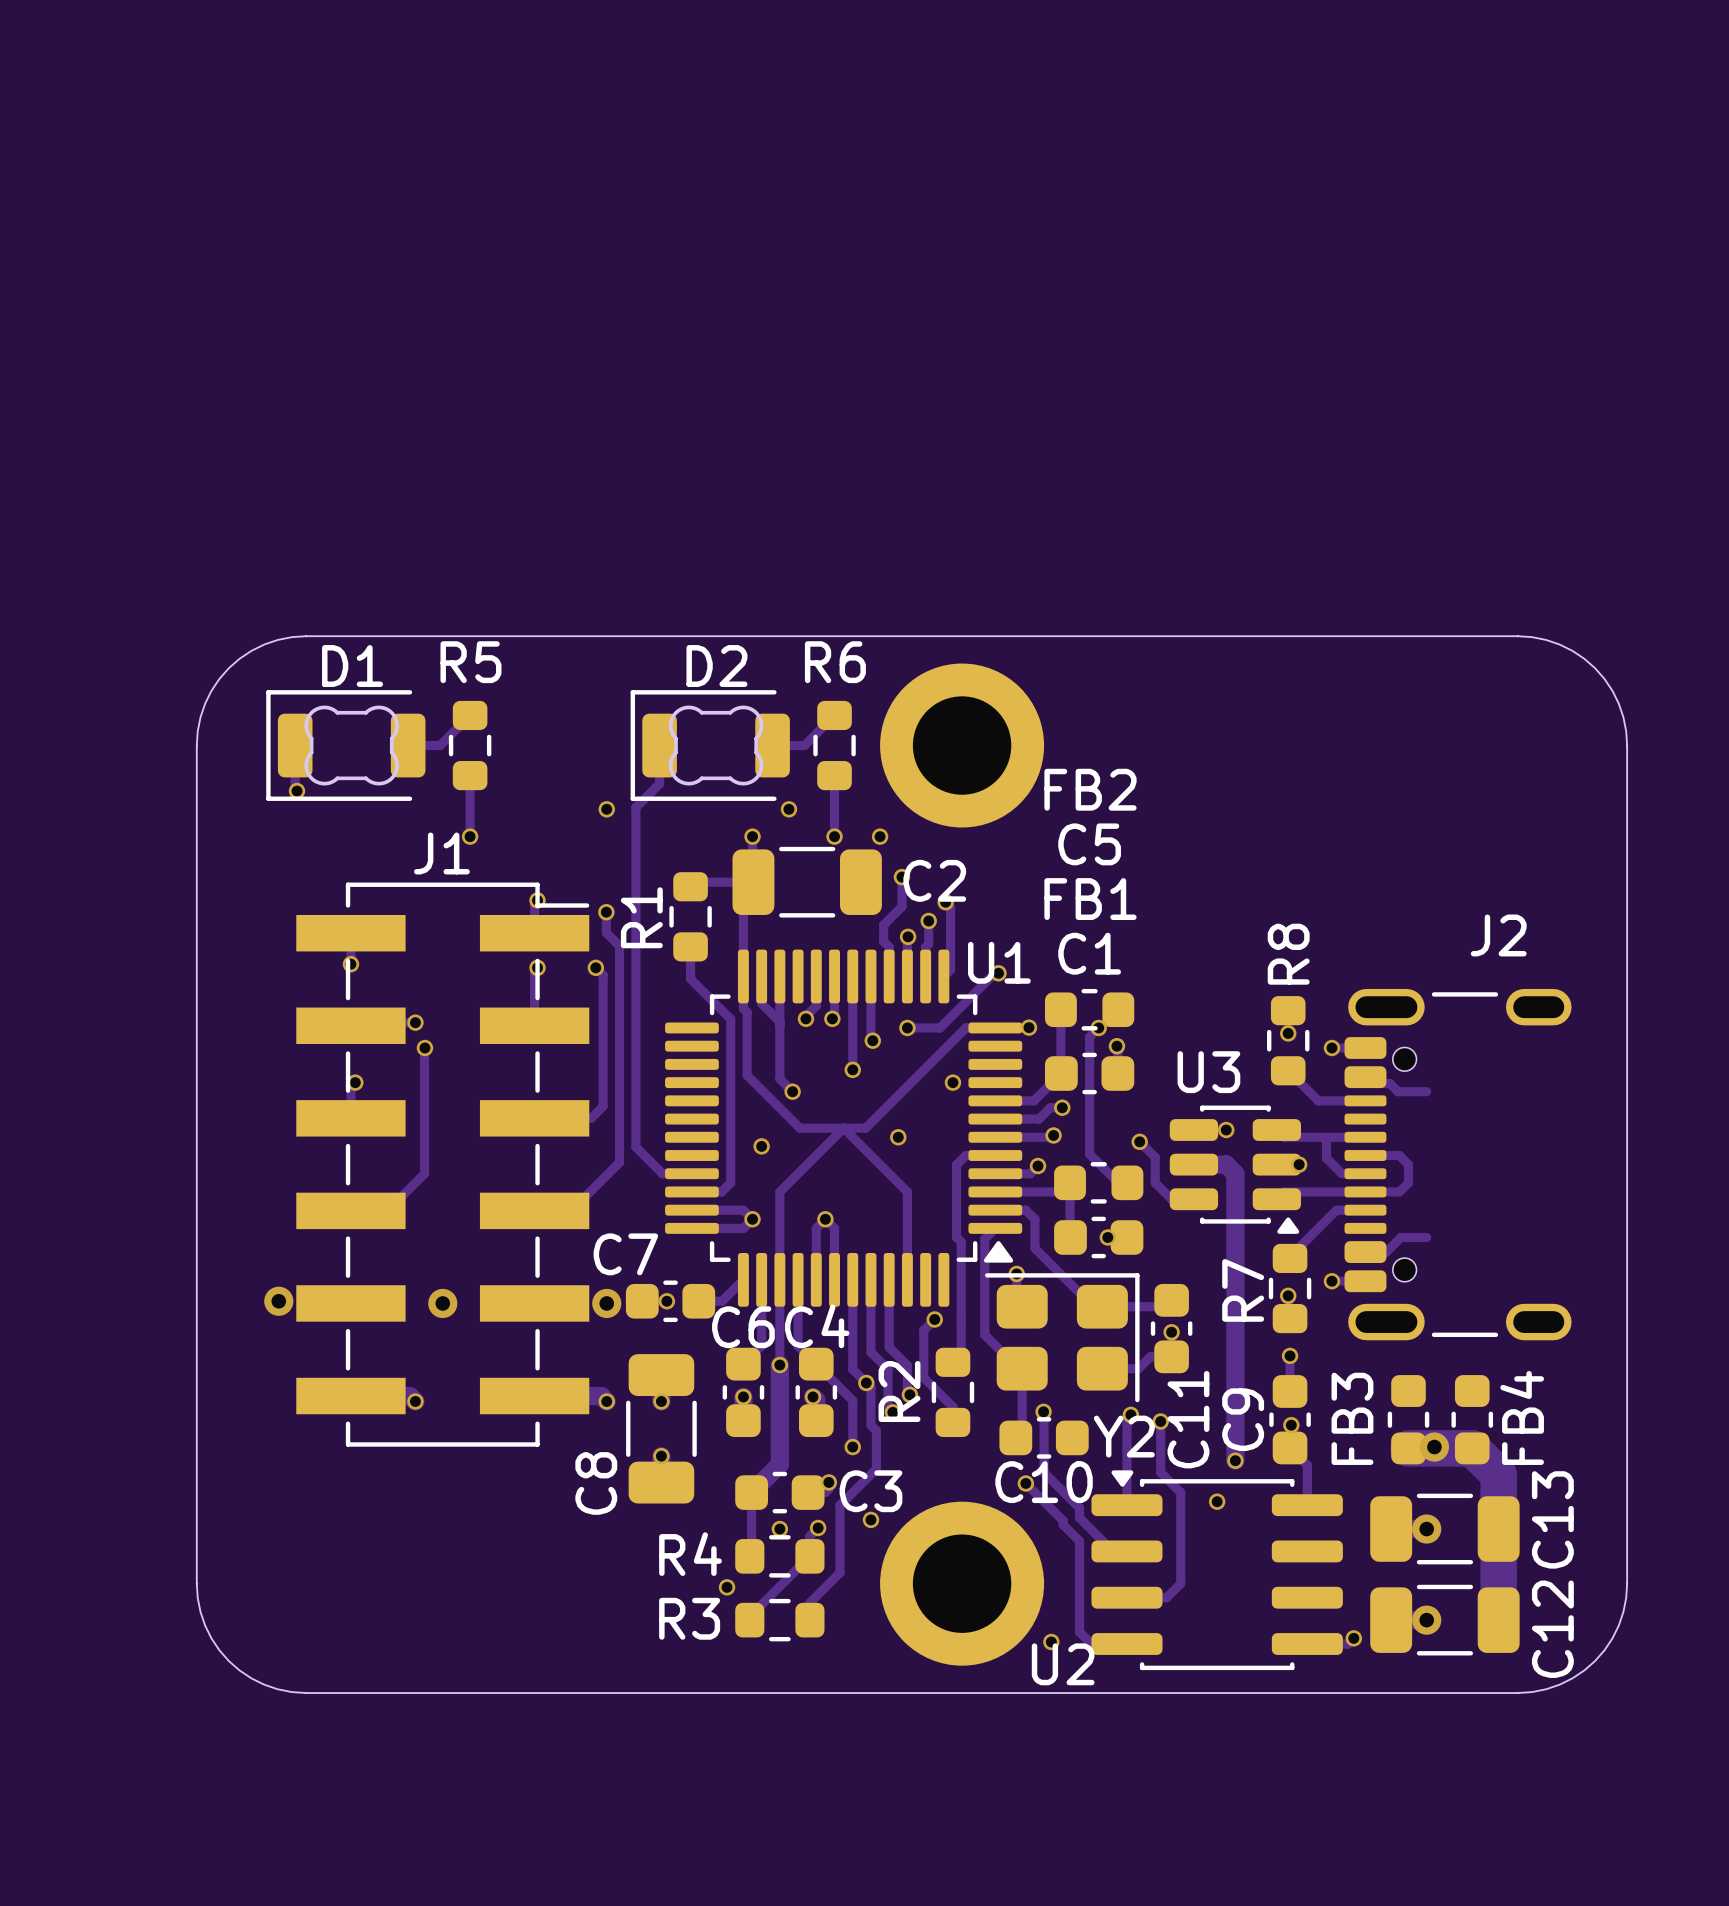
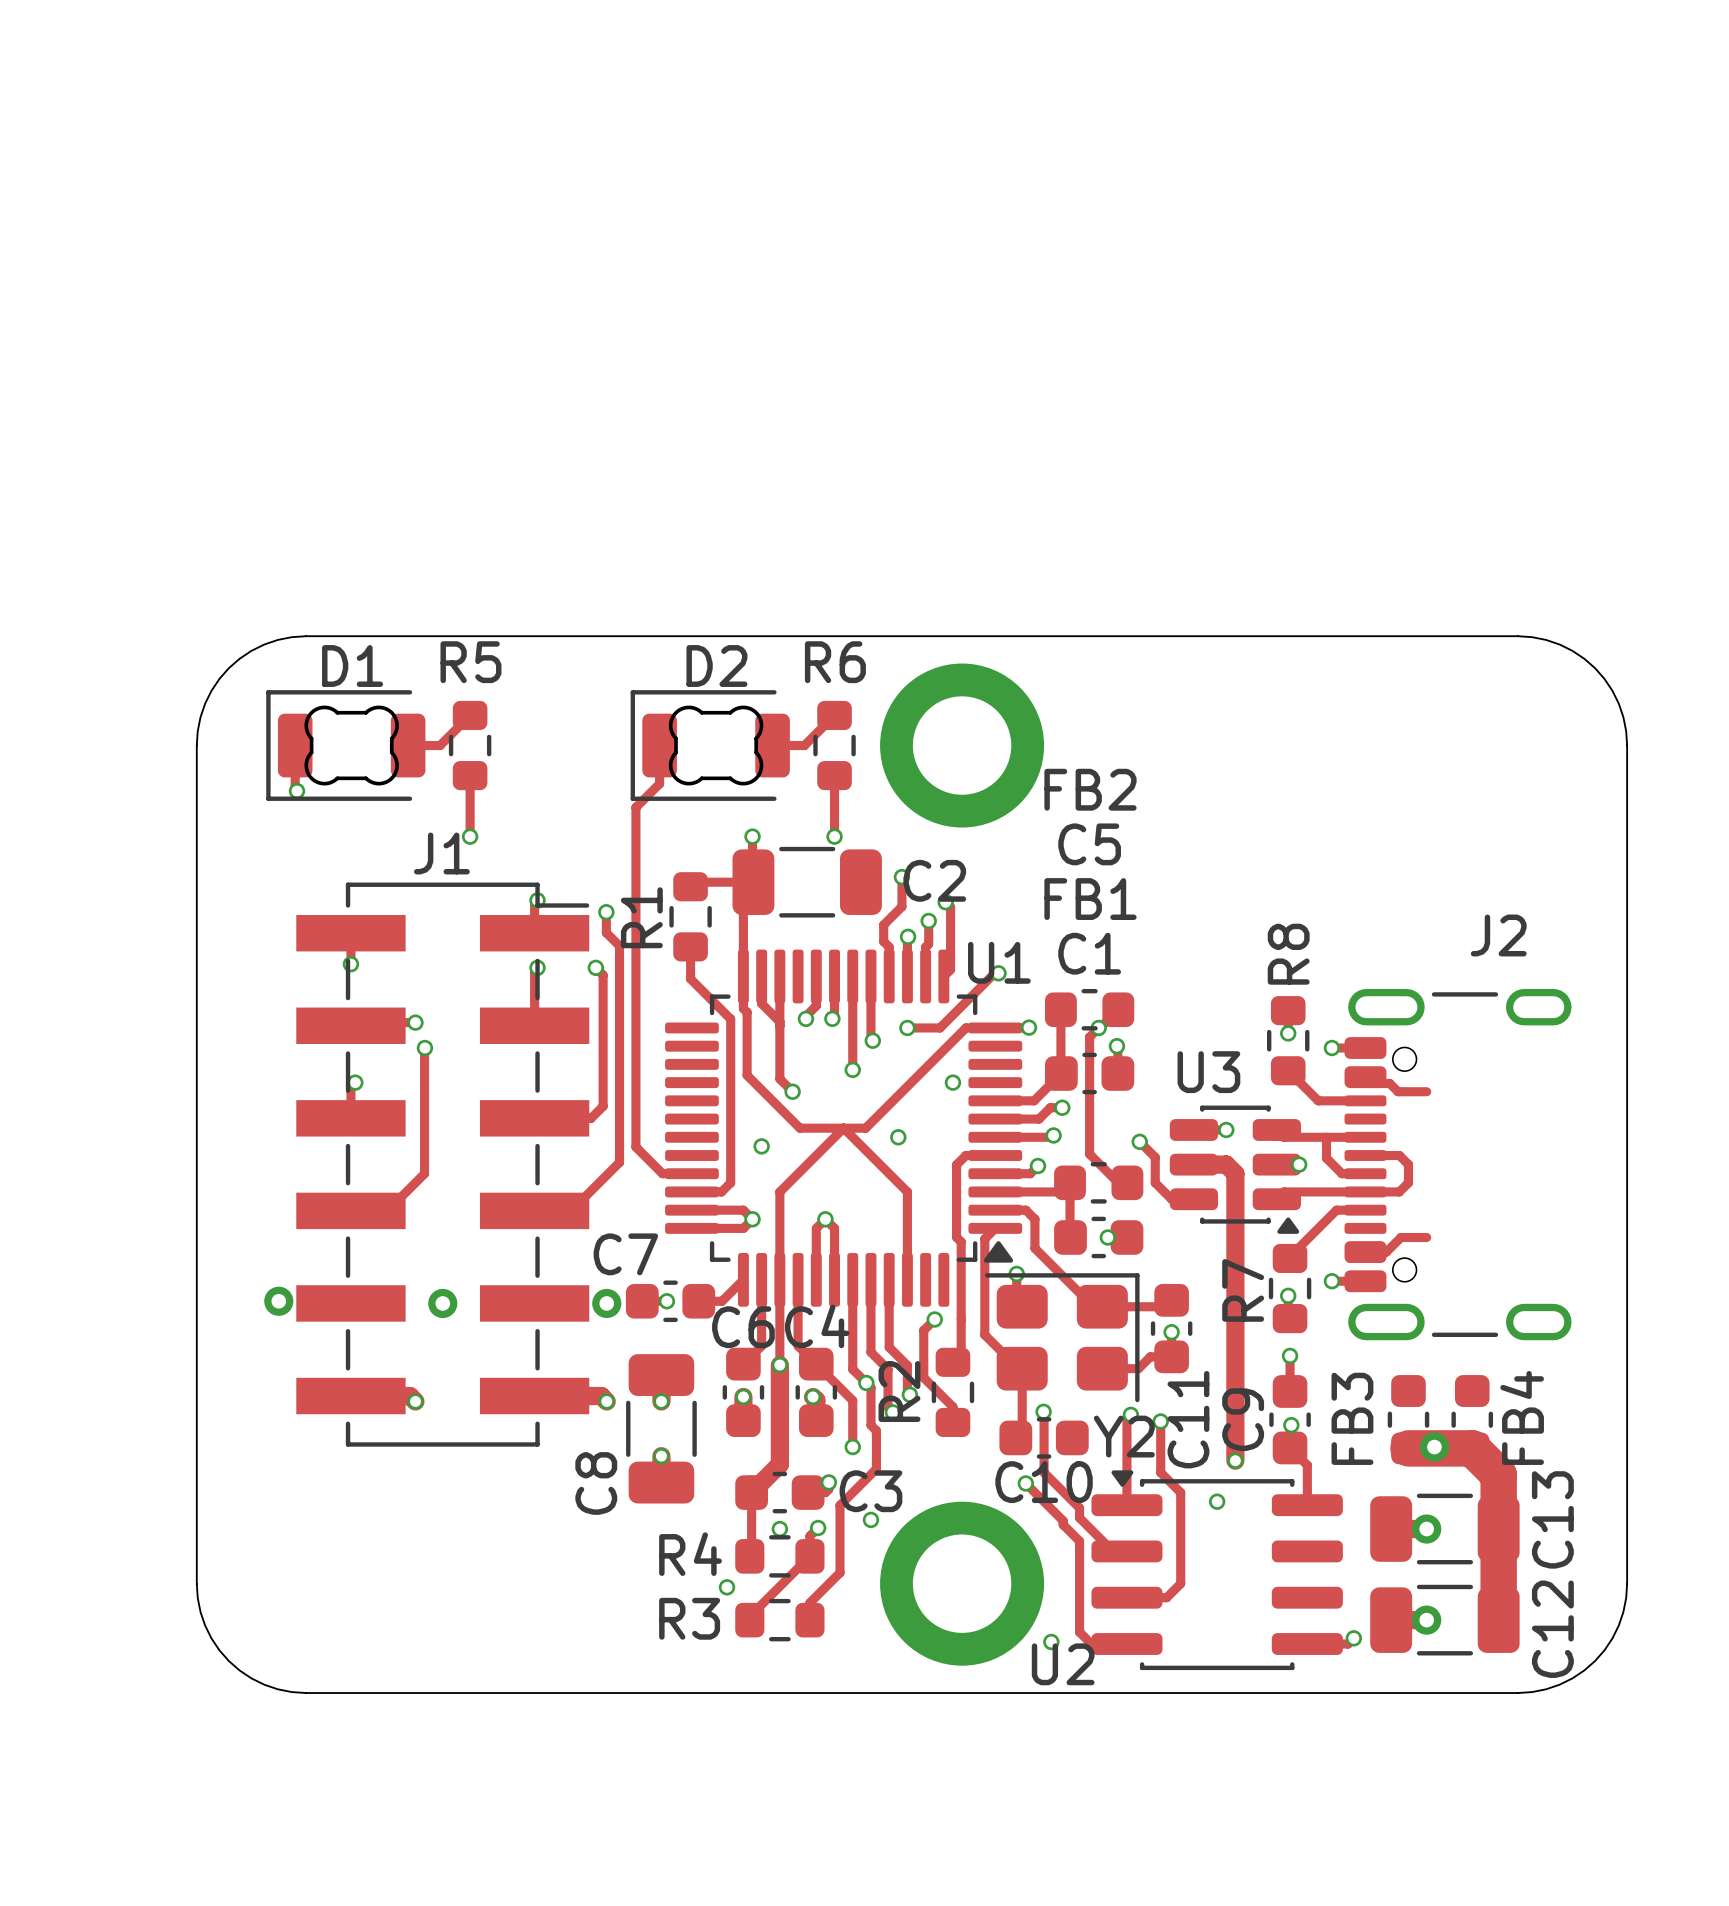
via: (606, 809) -> none
via: (788, 809) -> none
via: (880, 836) -> none

